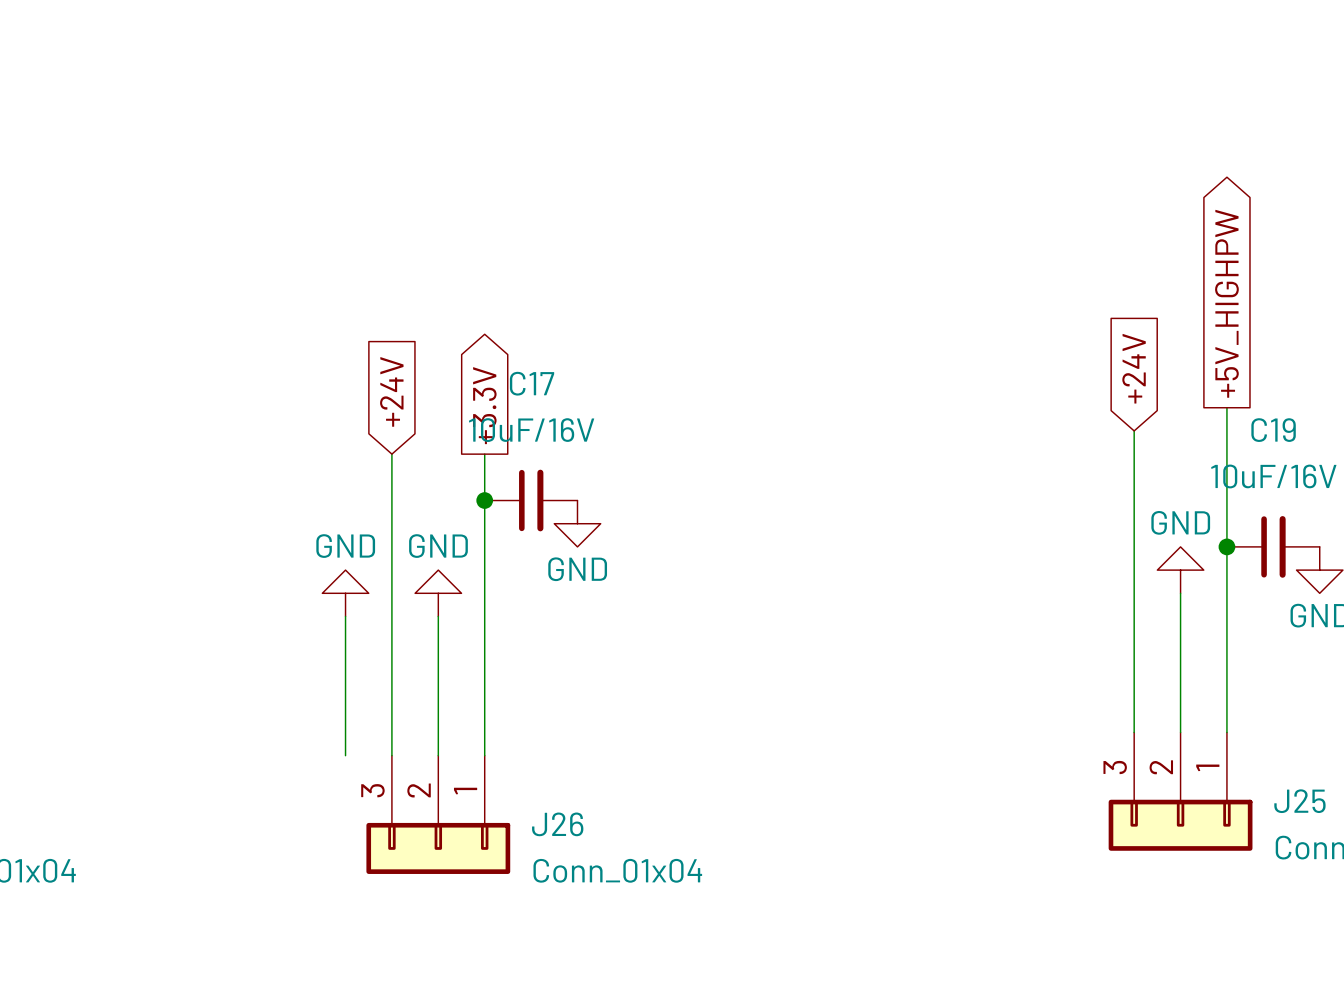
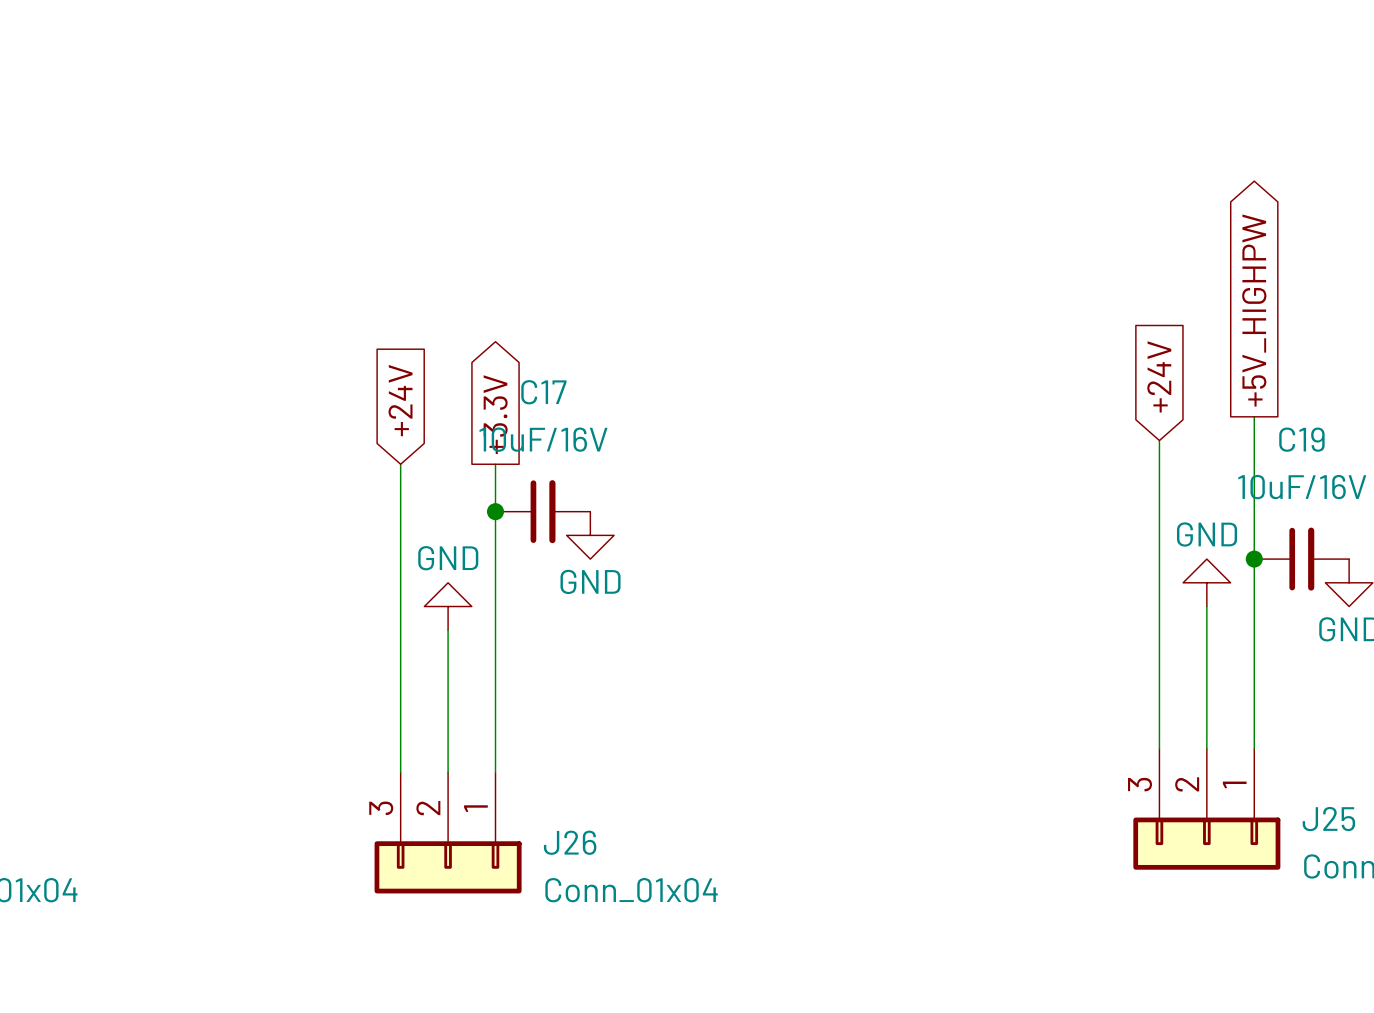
power symbol: GND (345, 593) -> none
wire: (345, 616) (345, 755) -> none

